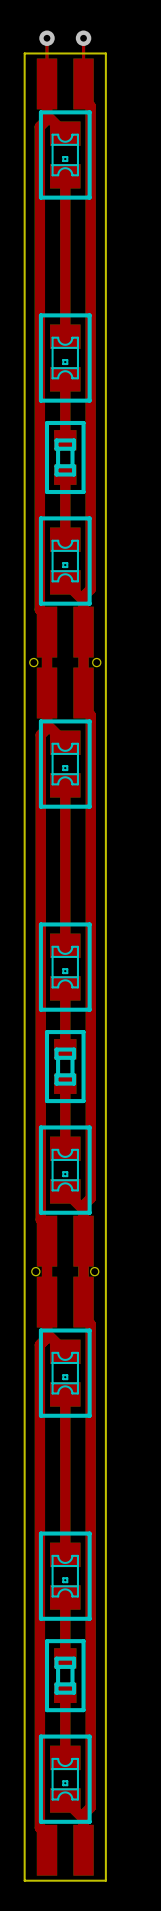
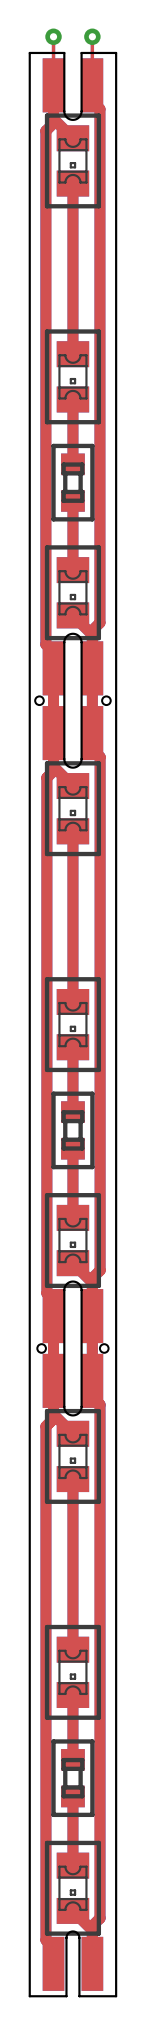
board edge: (57, 53) (73, 53) -> (64, 52) (64, 112) (66, 117) (72, 119) (79, 117) (81, 112) (81, 52)
board edge: none -> (64, 642) (64, 760) (67, 765) (74, 767) (79, 765) (81, 759) (81, 641) (78, 635) (71, 633) (66, 636) (64, 642)
board edge: none -> (64, 1290) (64, 1407) (67, 1413) (74, 1415) (79, 1412) (81, 1406) (81, 1289) (78, 1283) (71, 1281) (66, 1284) (64, 1290)
board edge: (59, 1880) (71, 1880) -> (66, 1996) (66, 1937) (69, 1932) (72, 1931) (76, 1932) (79, 1937) (79, 1996)

